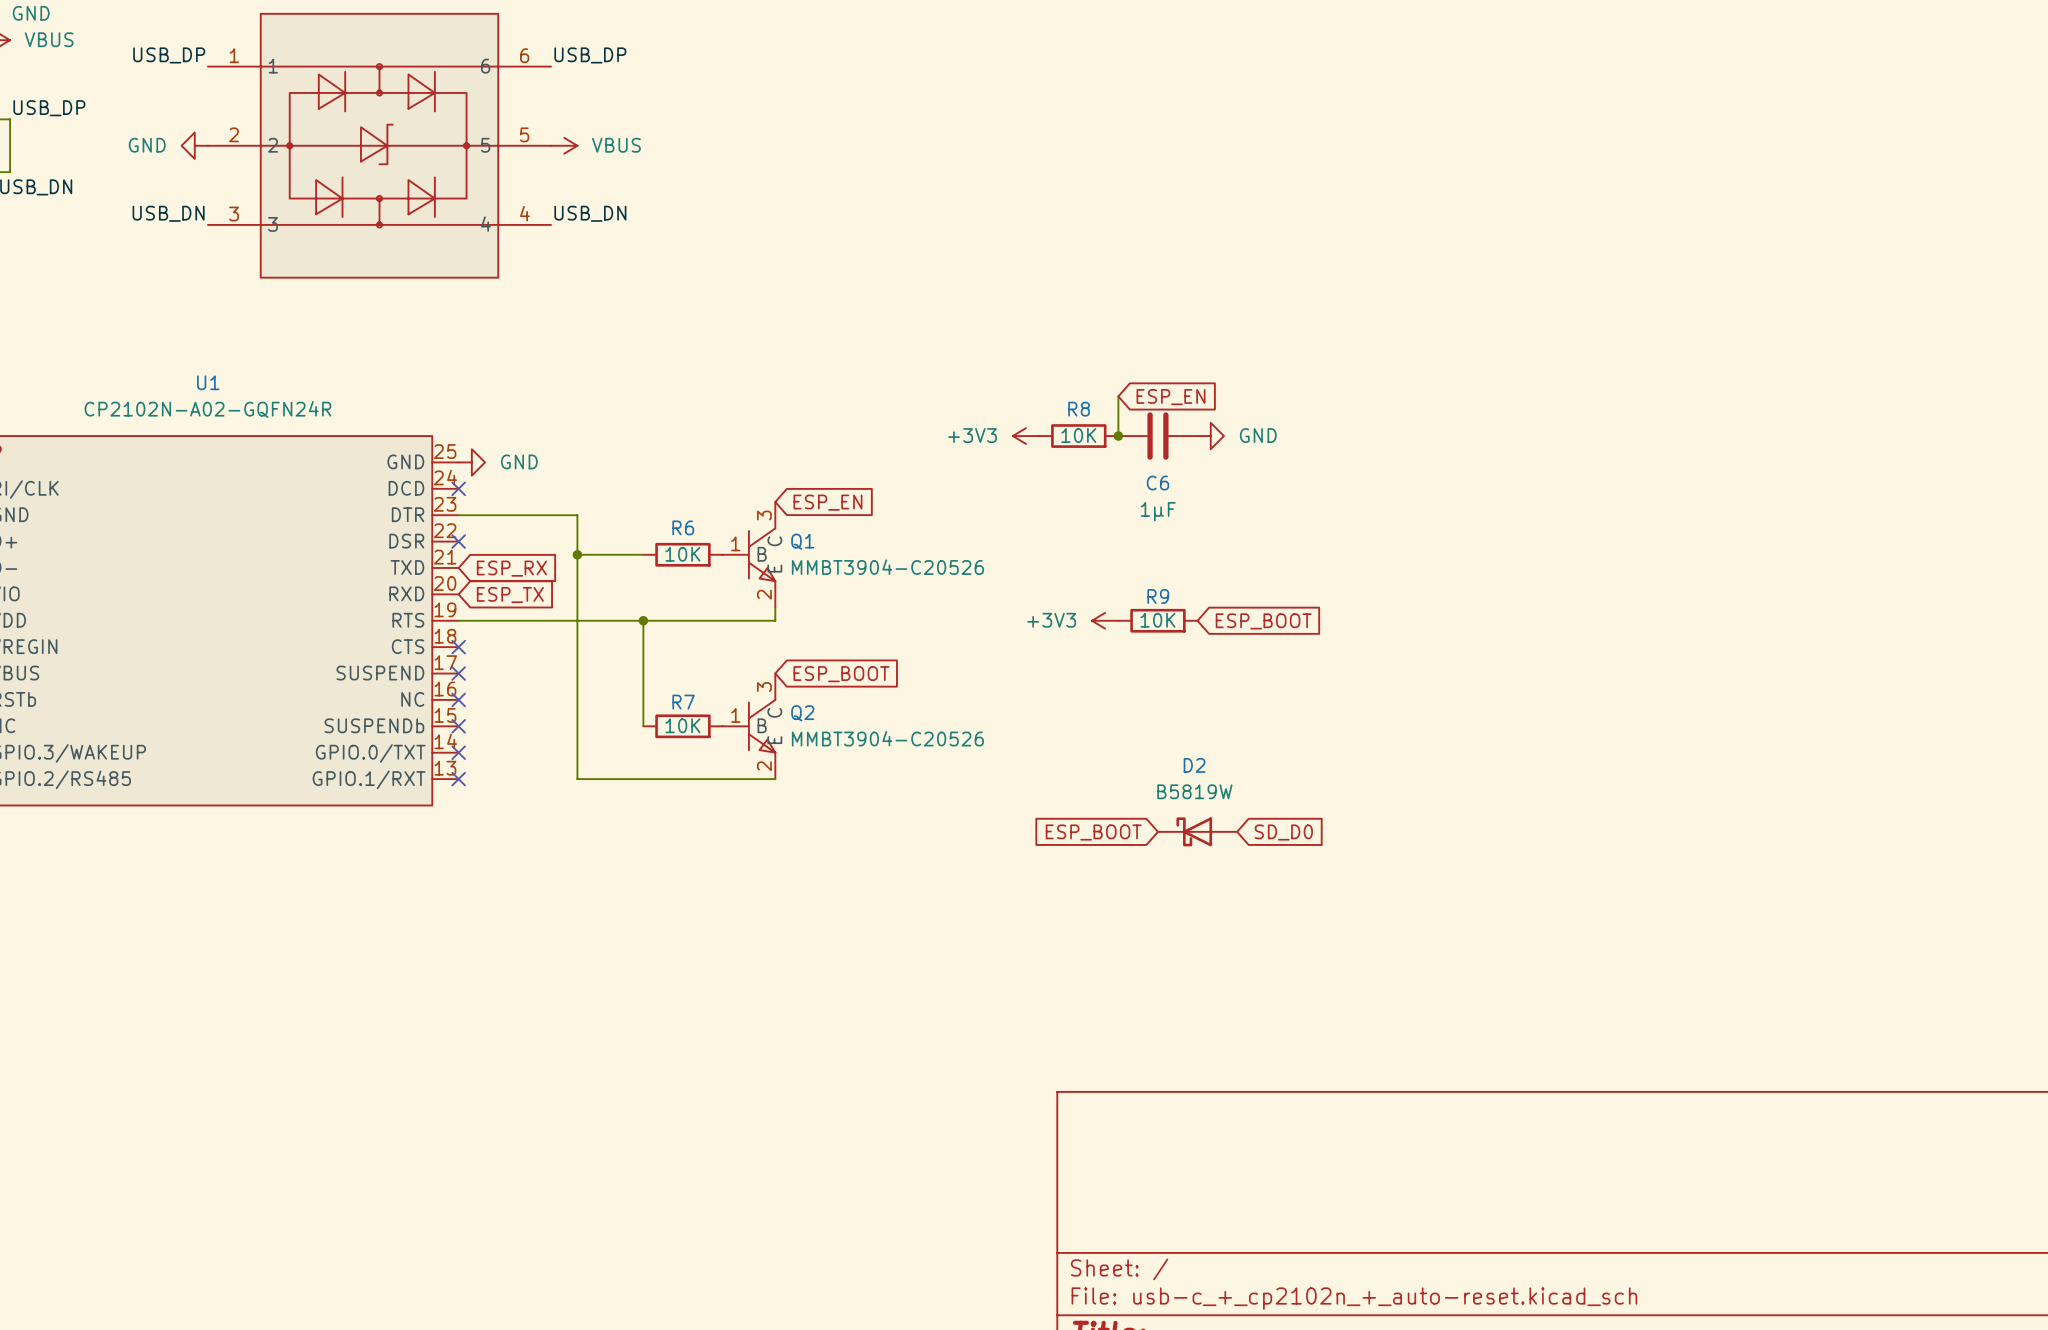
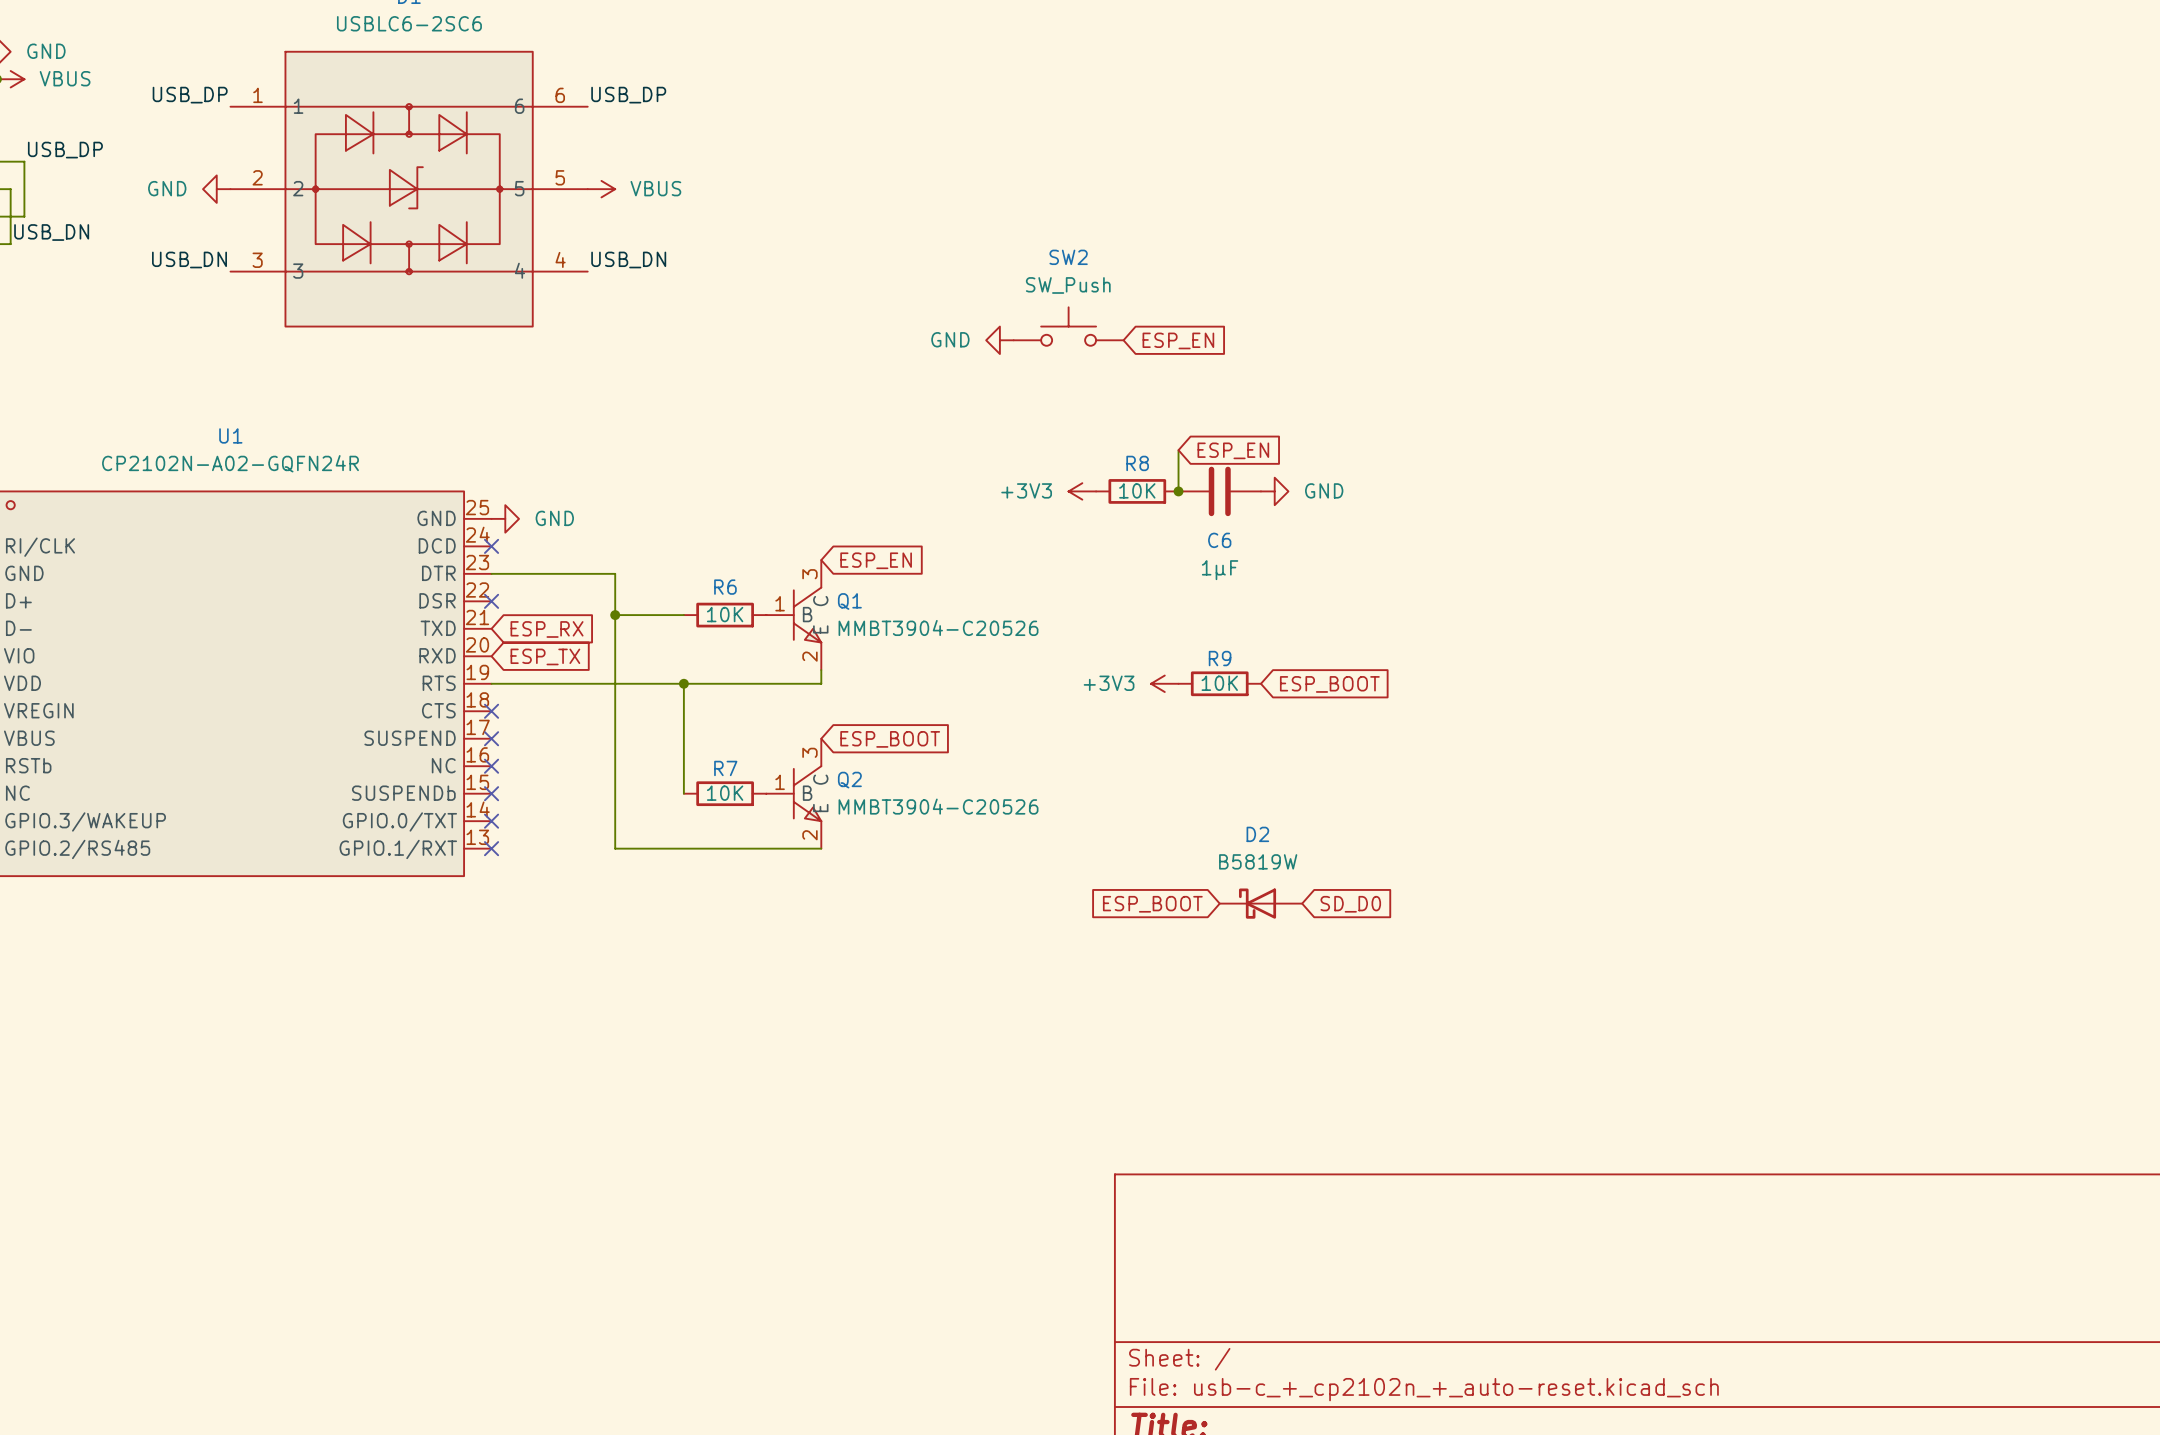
SW2: none -> SW_Push (1068, 326)
power symbol: none -> GND (999, 340)
global label: none -> ESP_EN (1178, 340)

